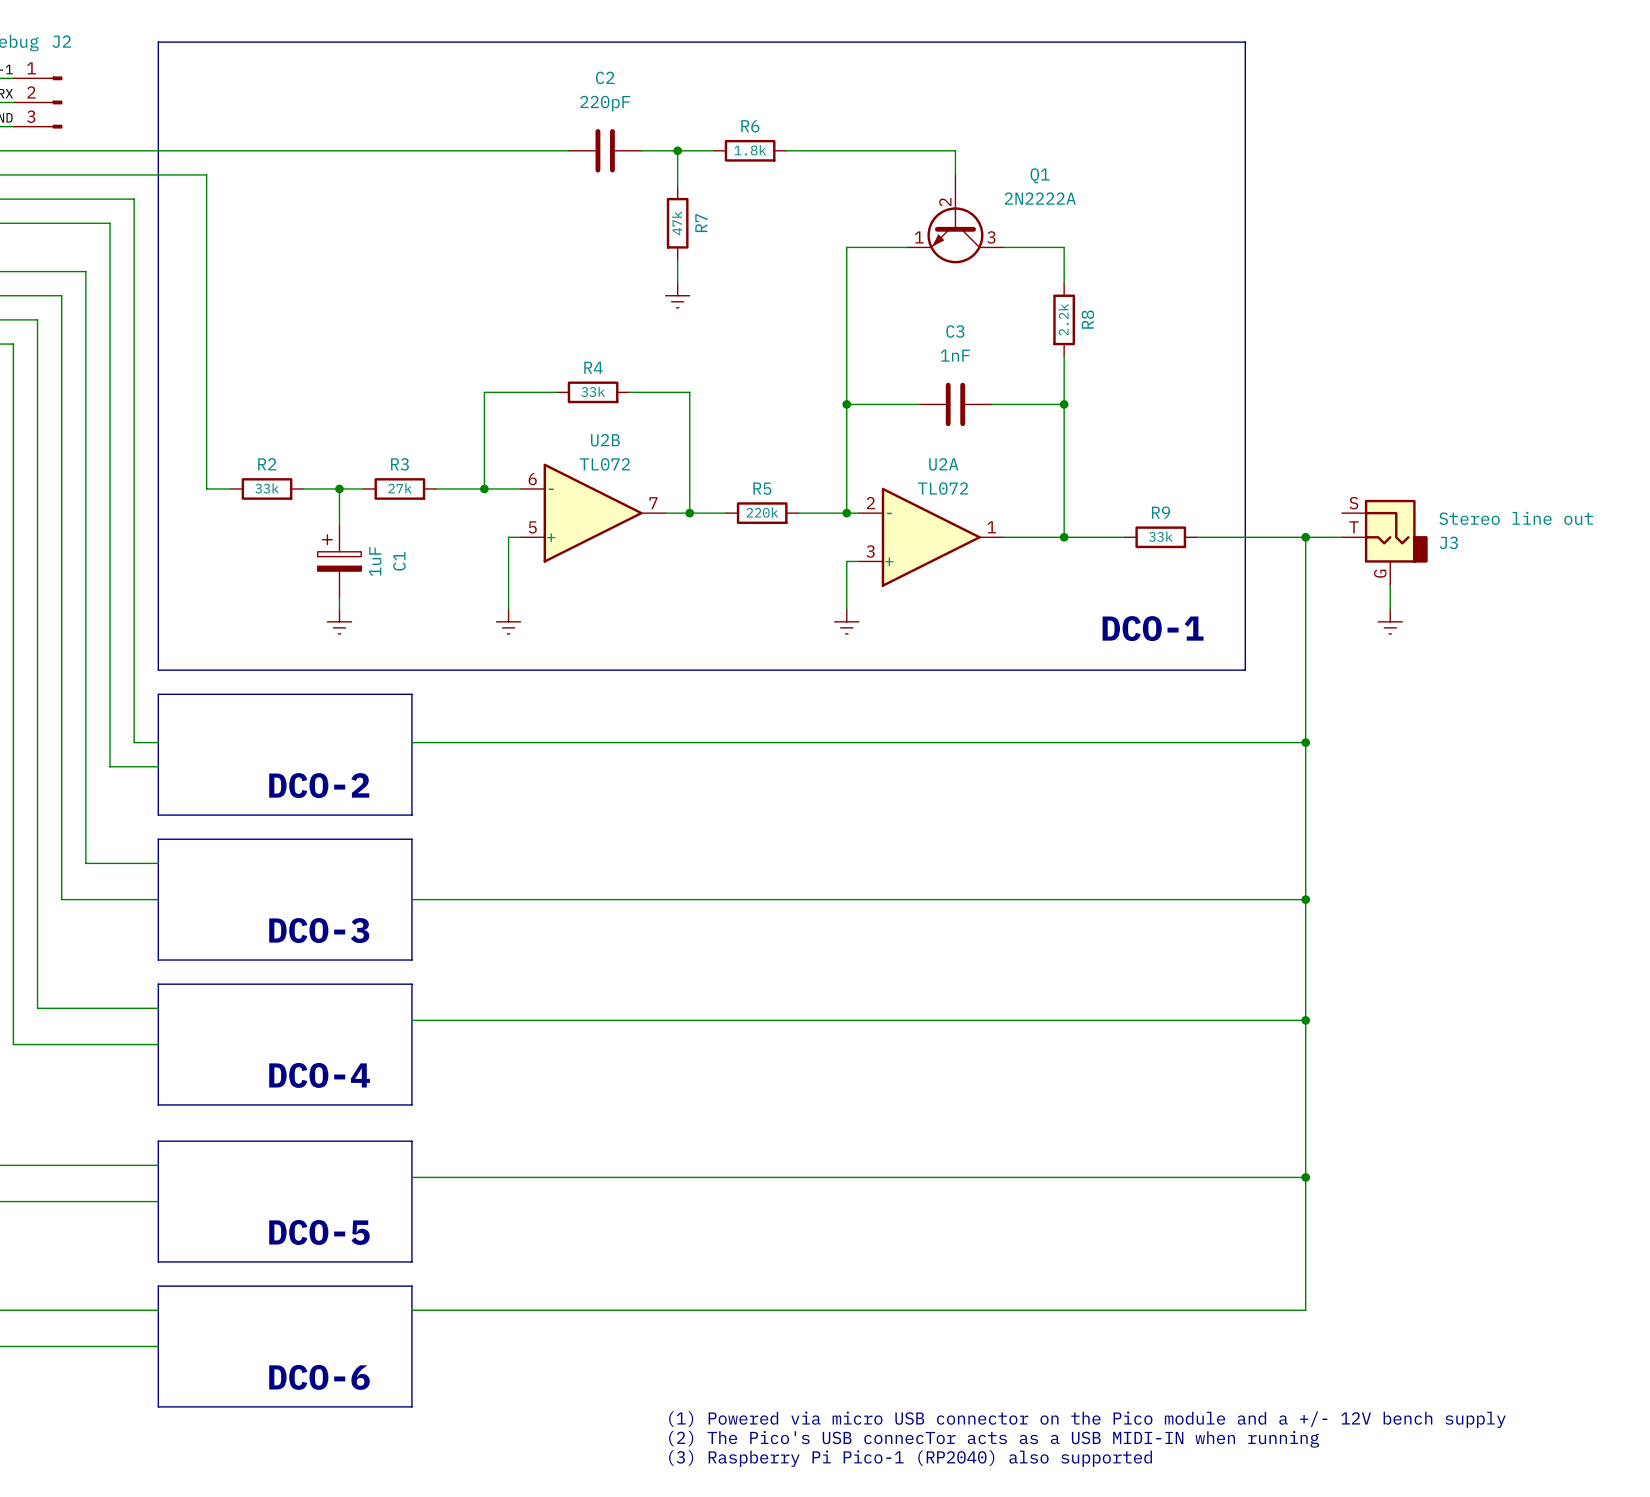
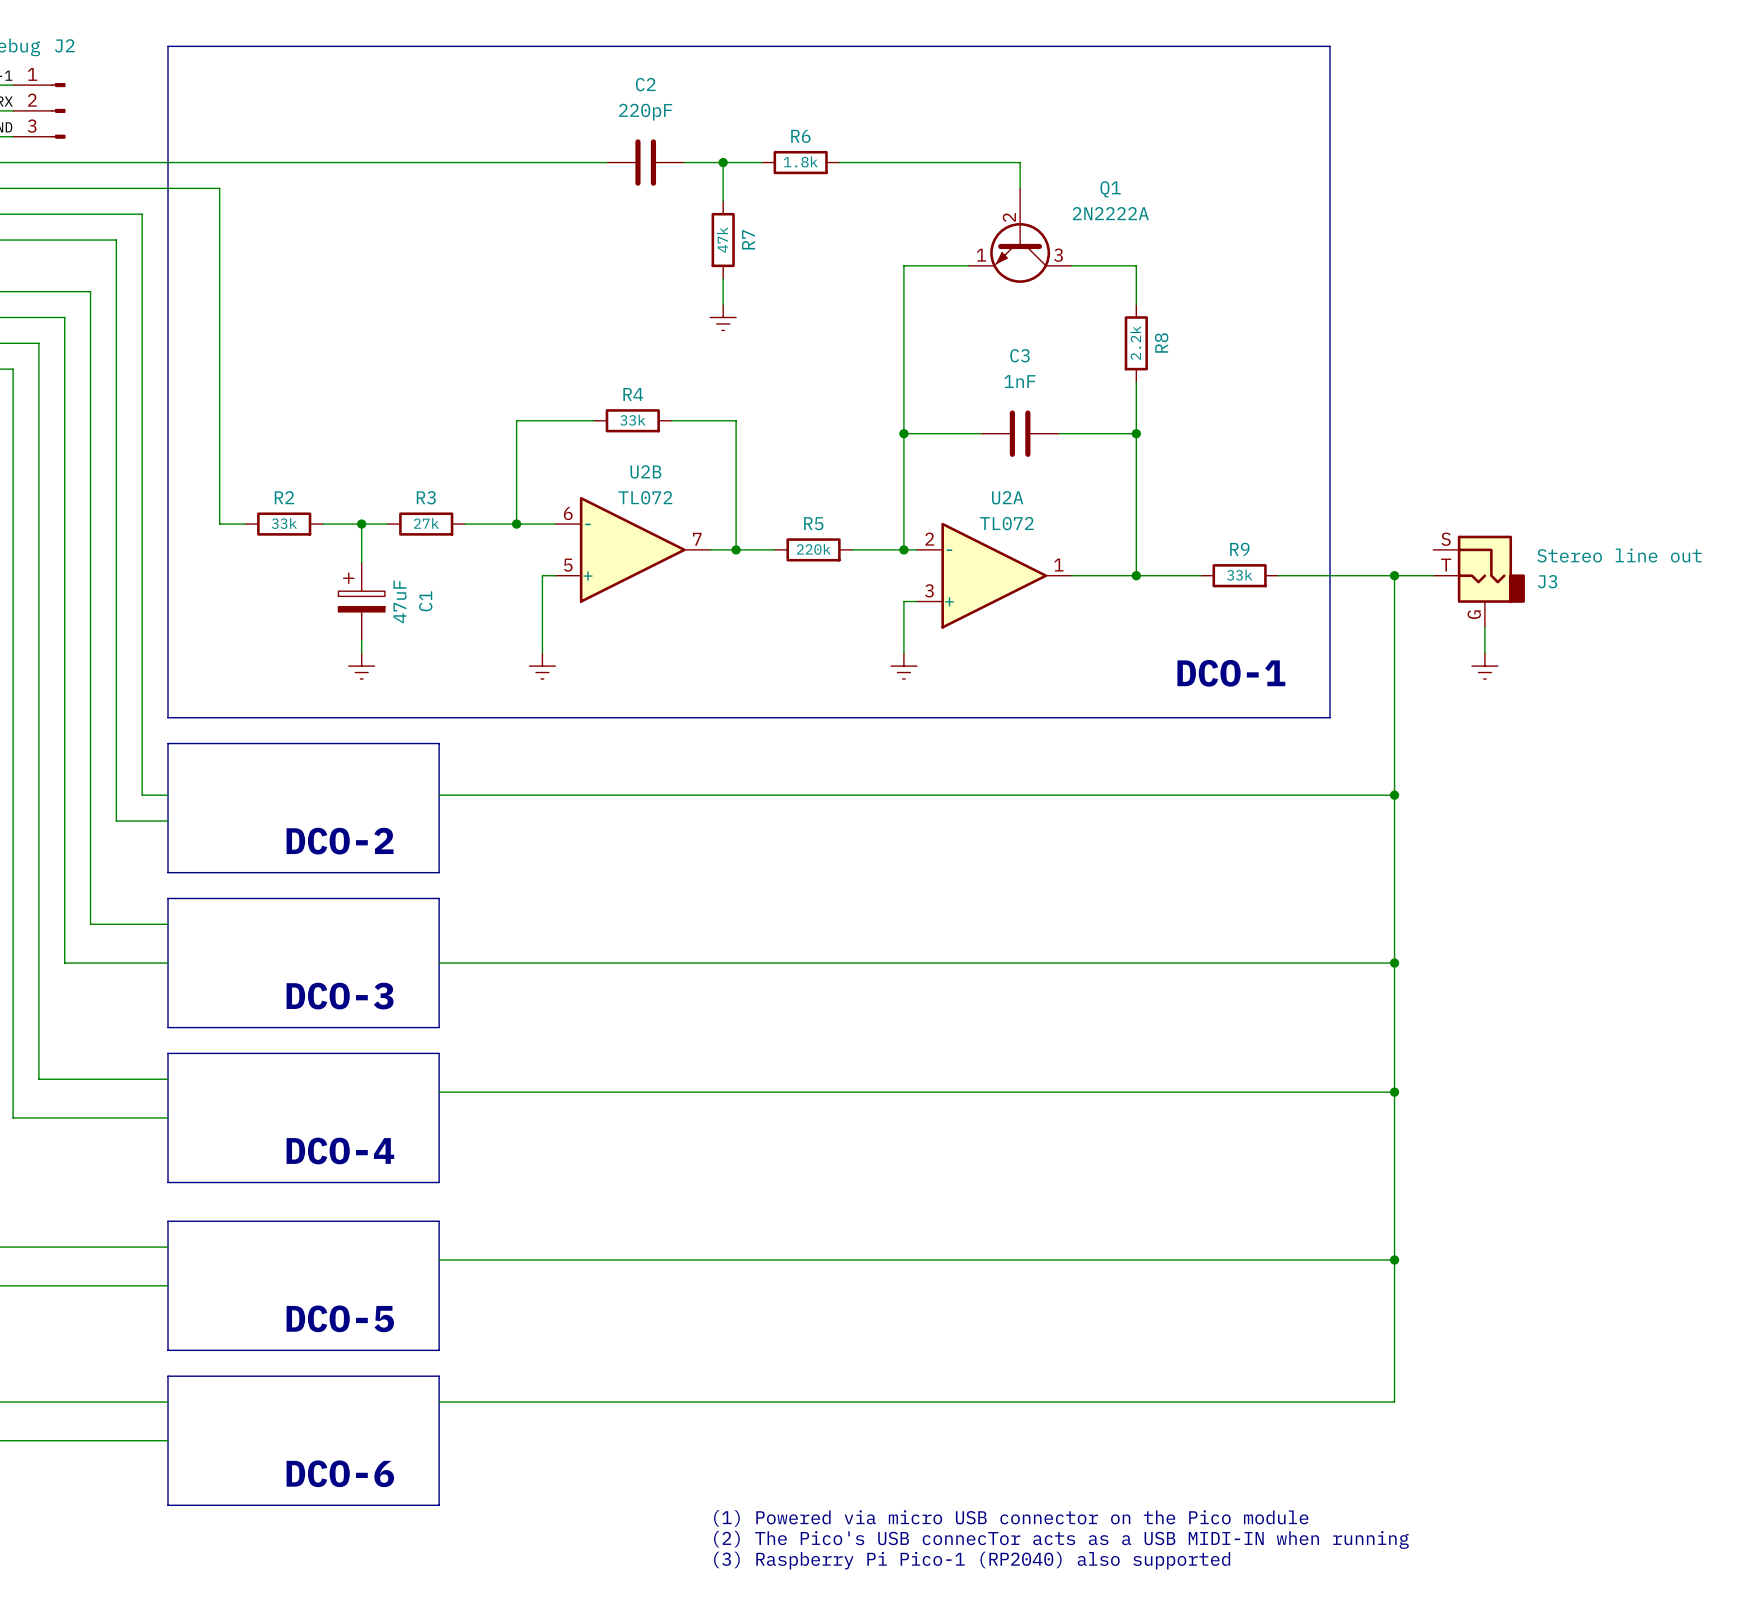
C1 value: 1uF (375, 561) -> 47uF (400, 601)
text: (1) Powered via micro USB connector on the Pico module and a +/- 12V bench supply (1087, 1419) -> (1) Powered via micro USB connector on the Pico module (1011, 1518)

